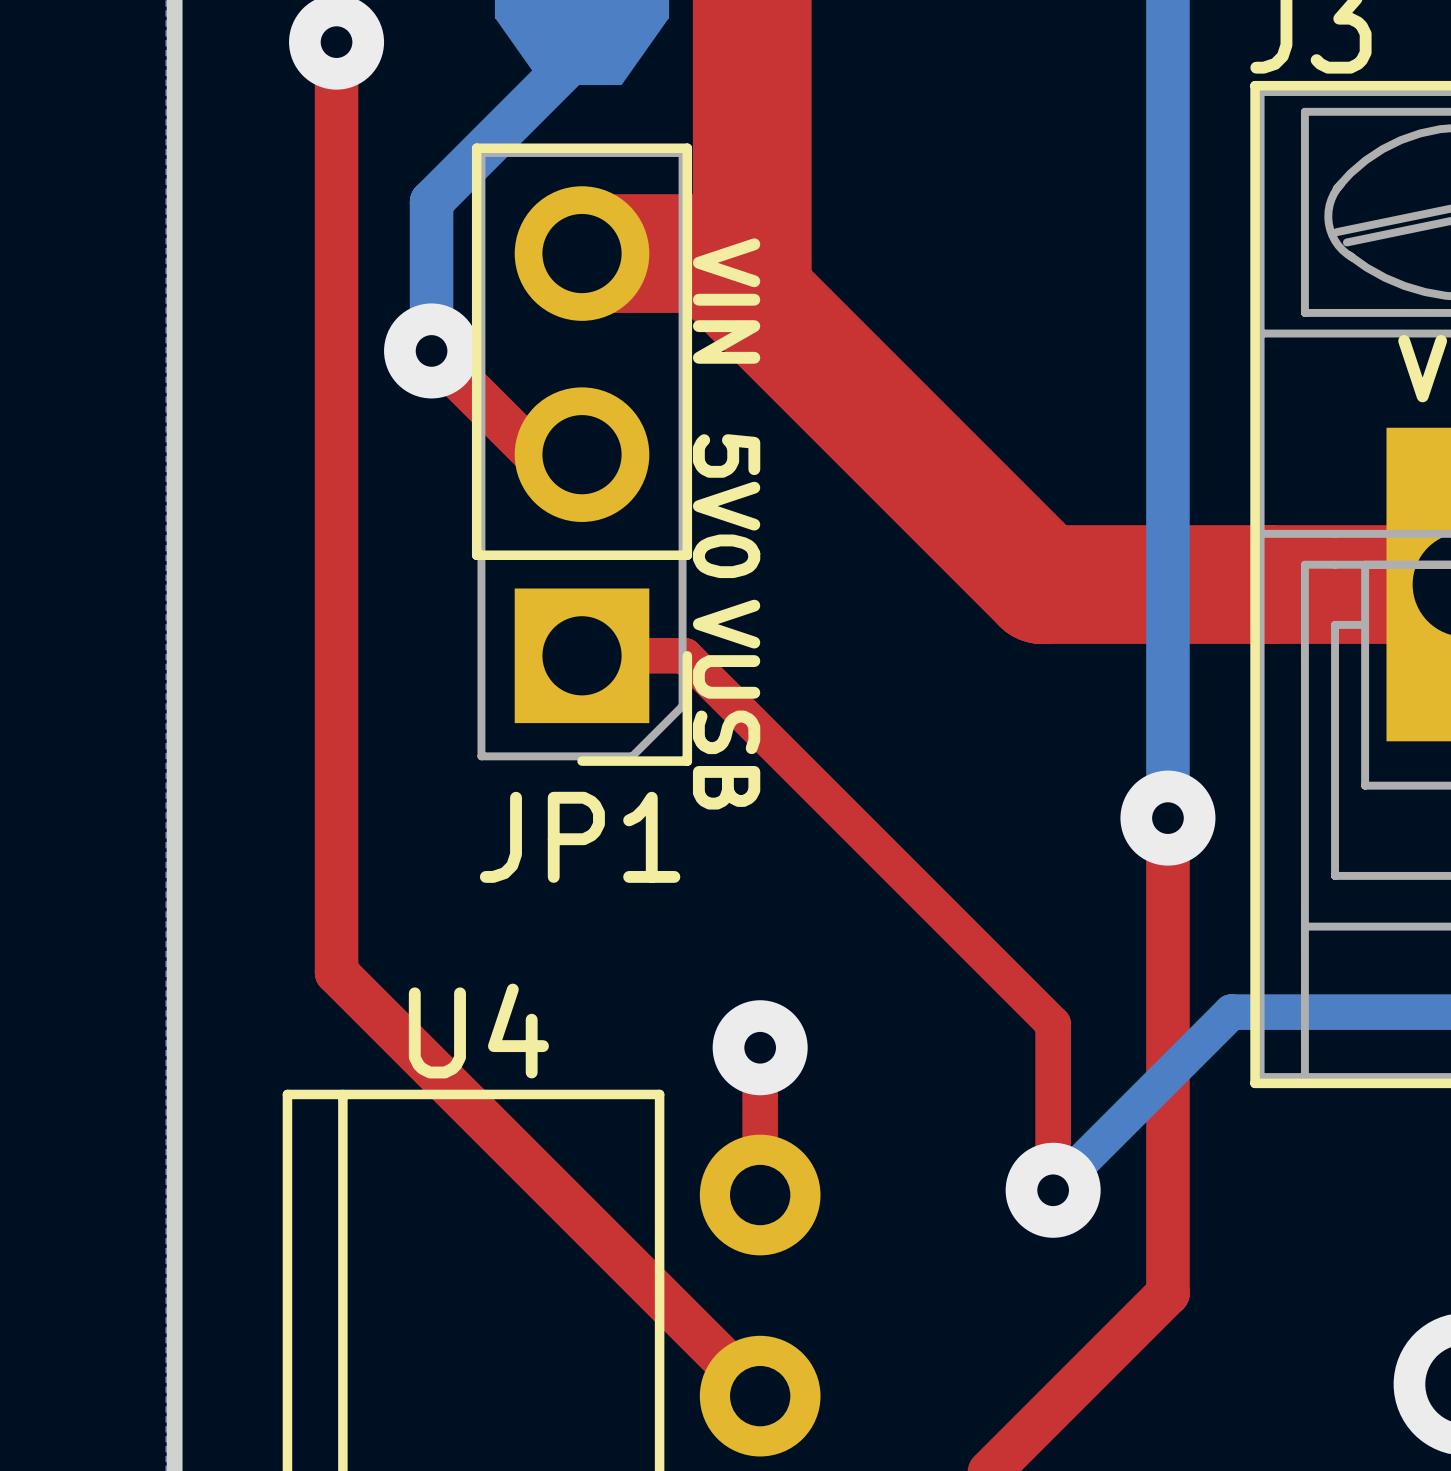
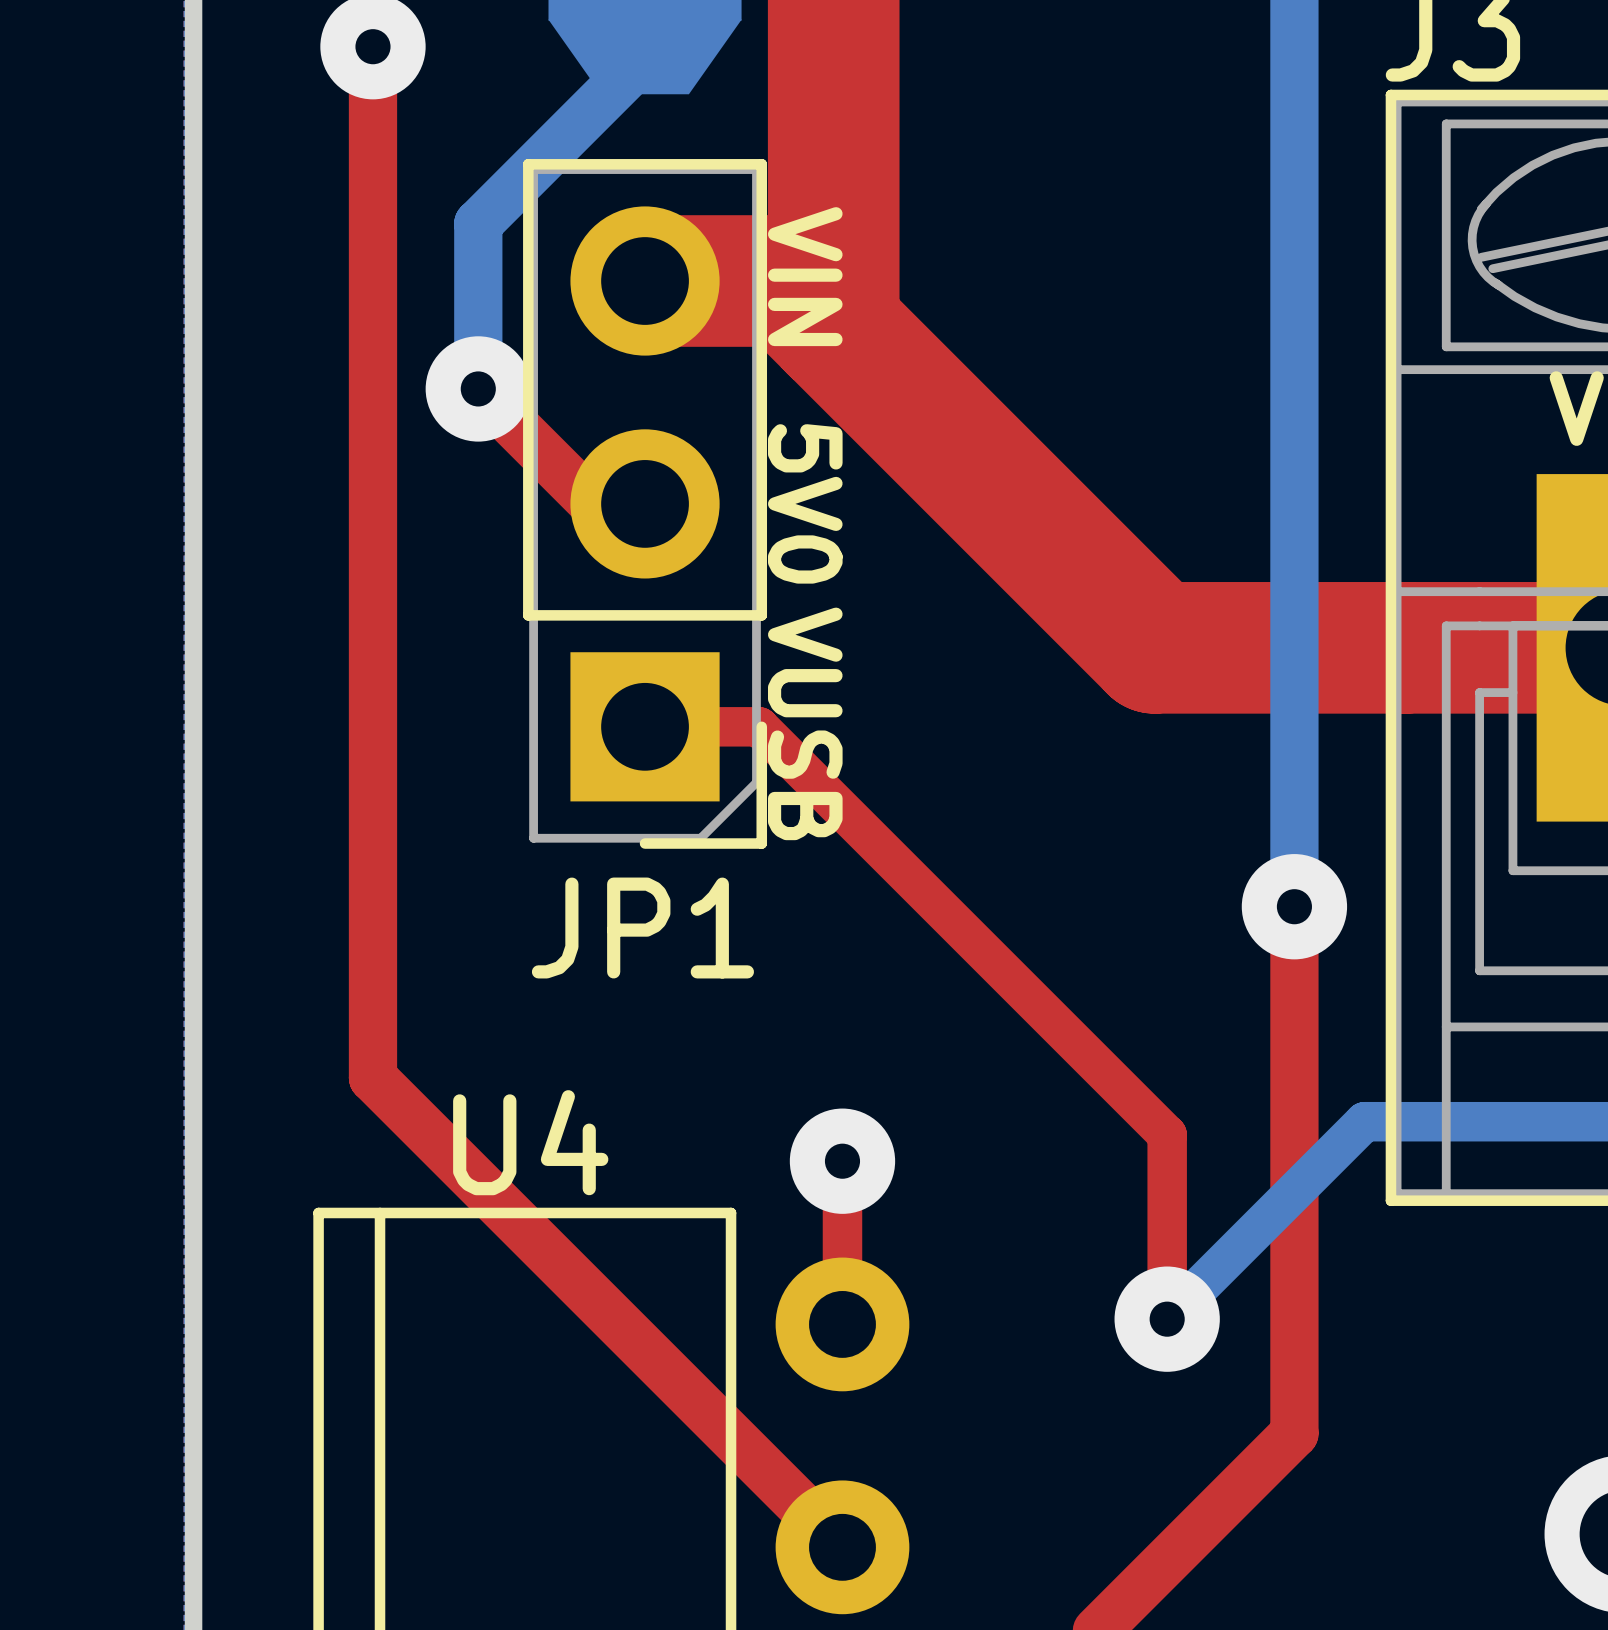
text position: VIN (726, 301) -> VIN (805, 276)
text position: 5V0 (726, 506) -> 5V0 (805, 503)
text position: VUSB (726, 704) -> VUSB (805, 723)

